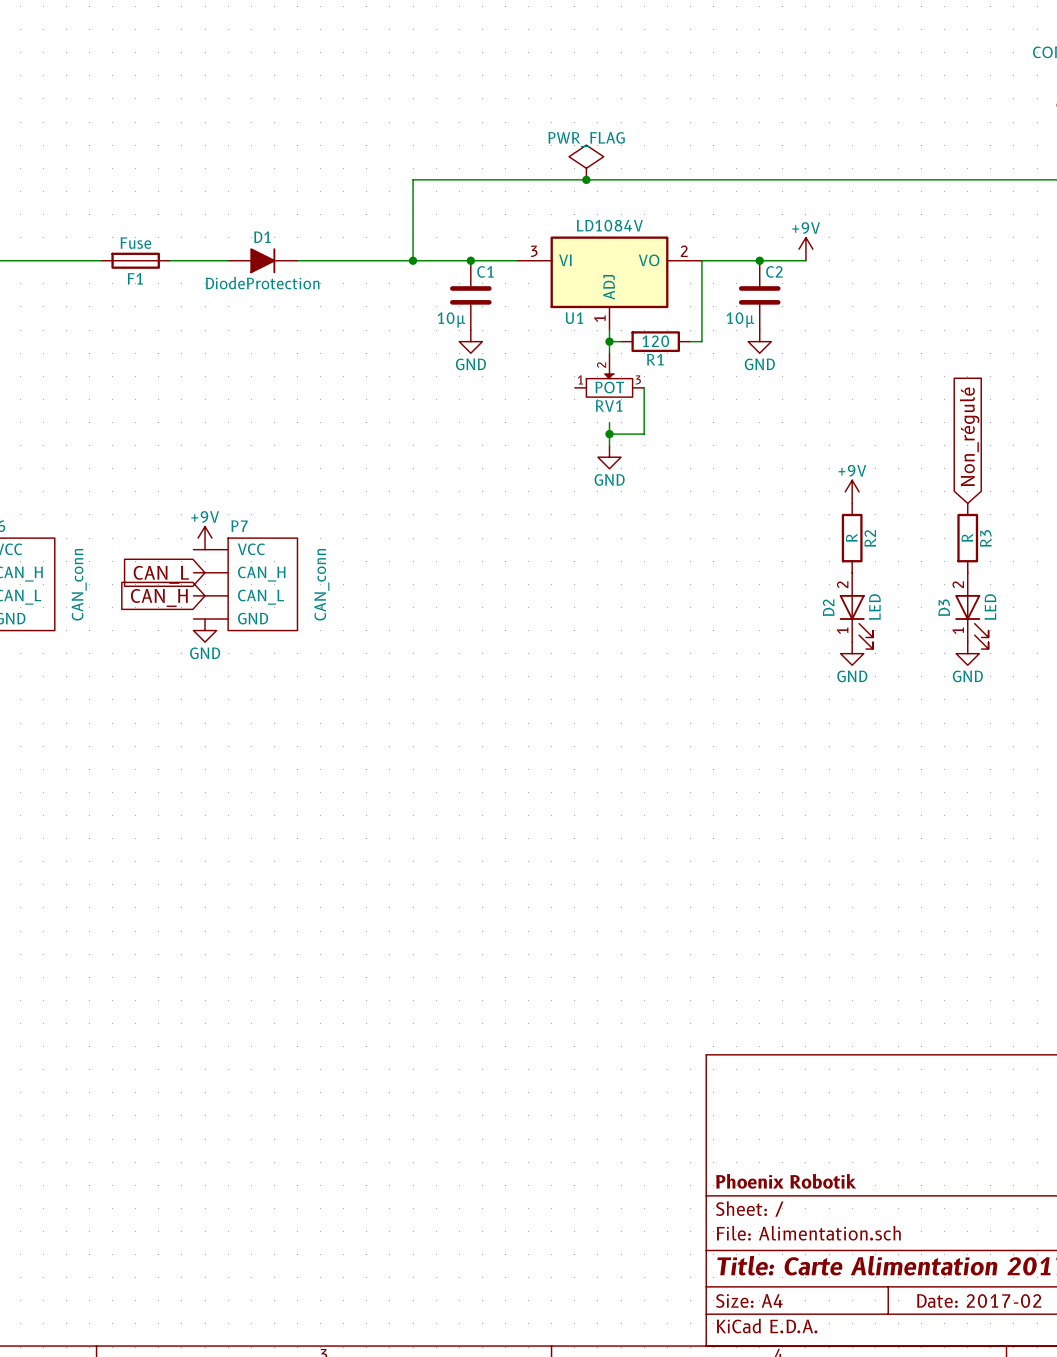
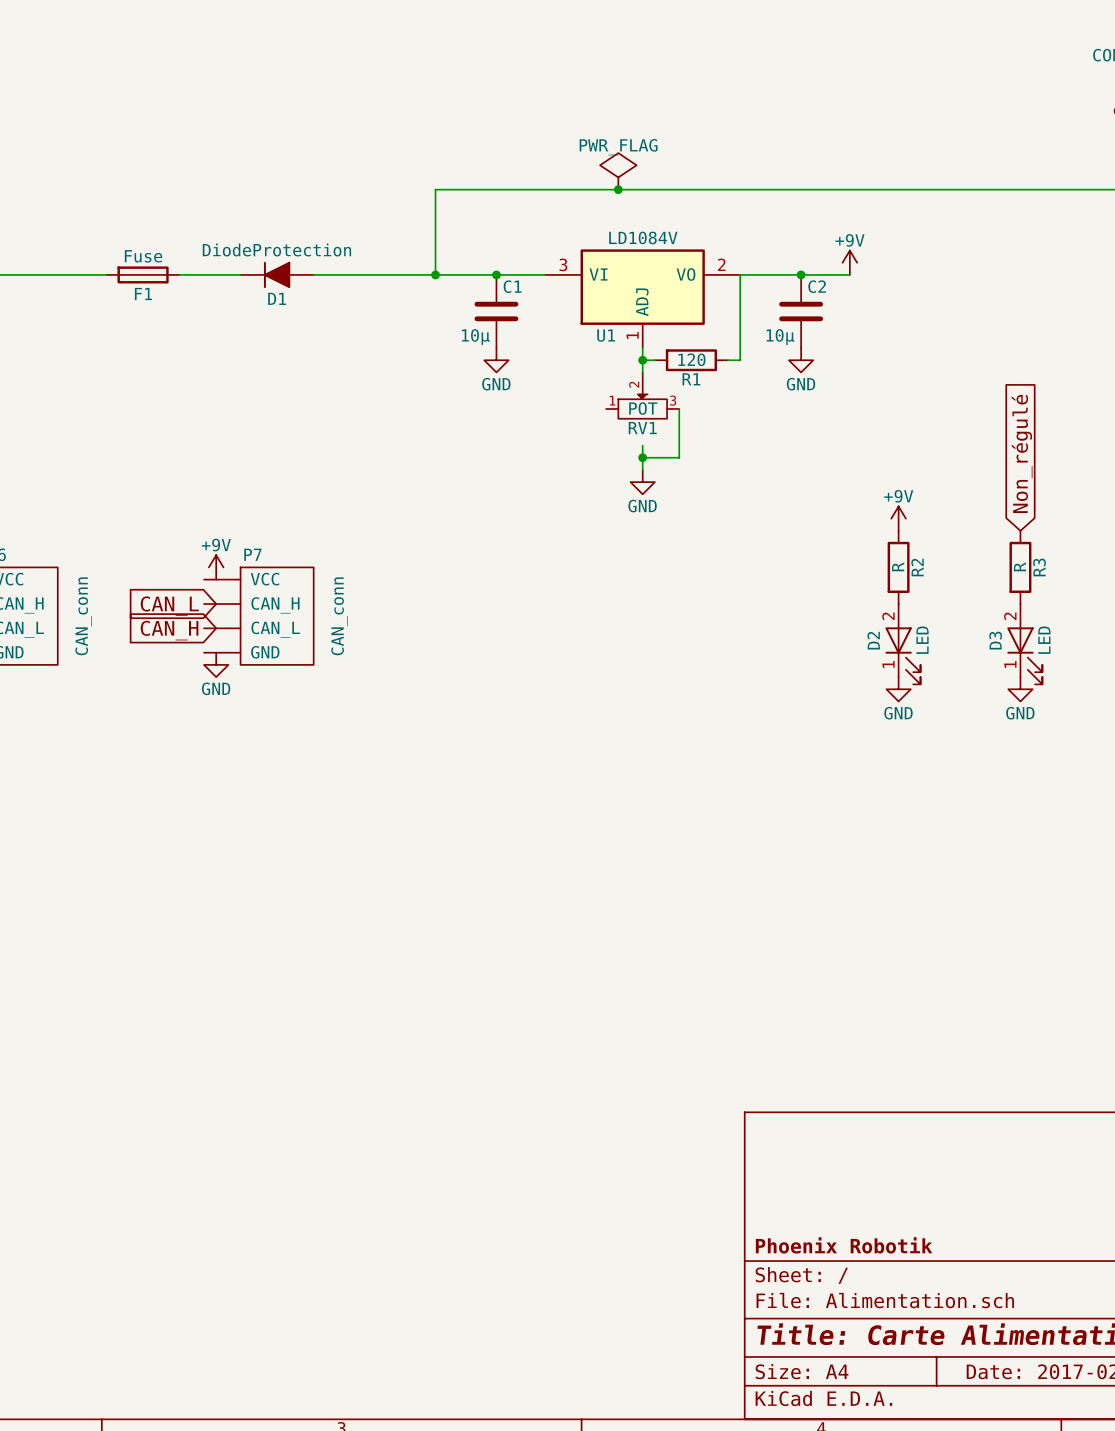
D1 rotation: 0° (262, 260) -> 180° (277, 274)

